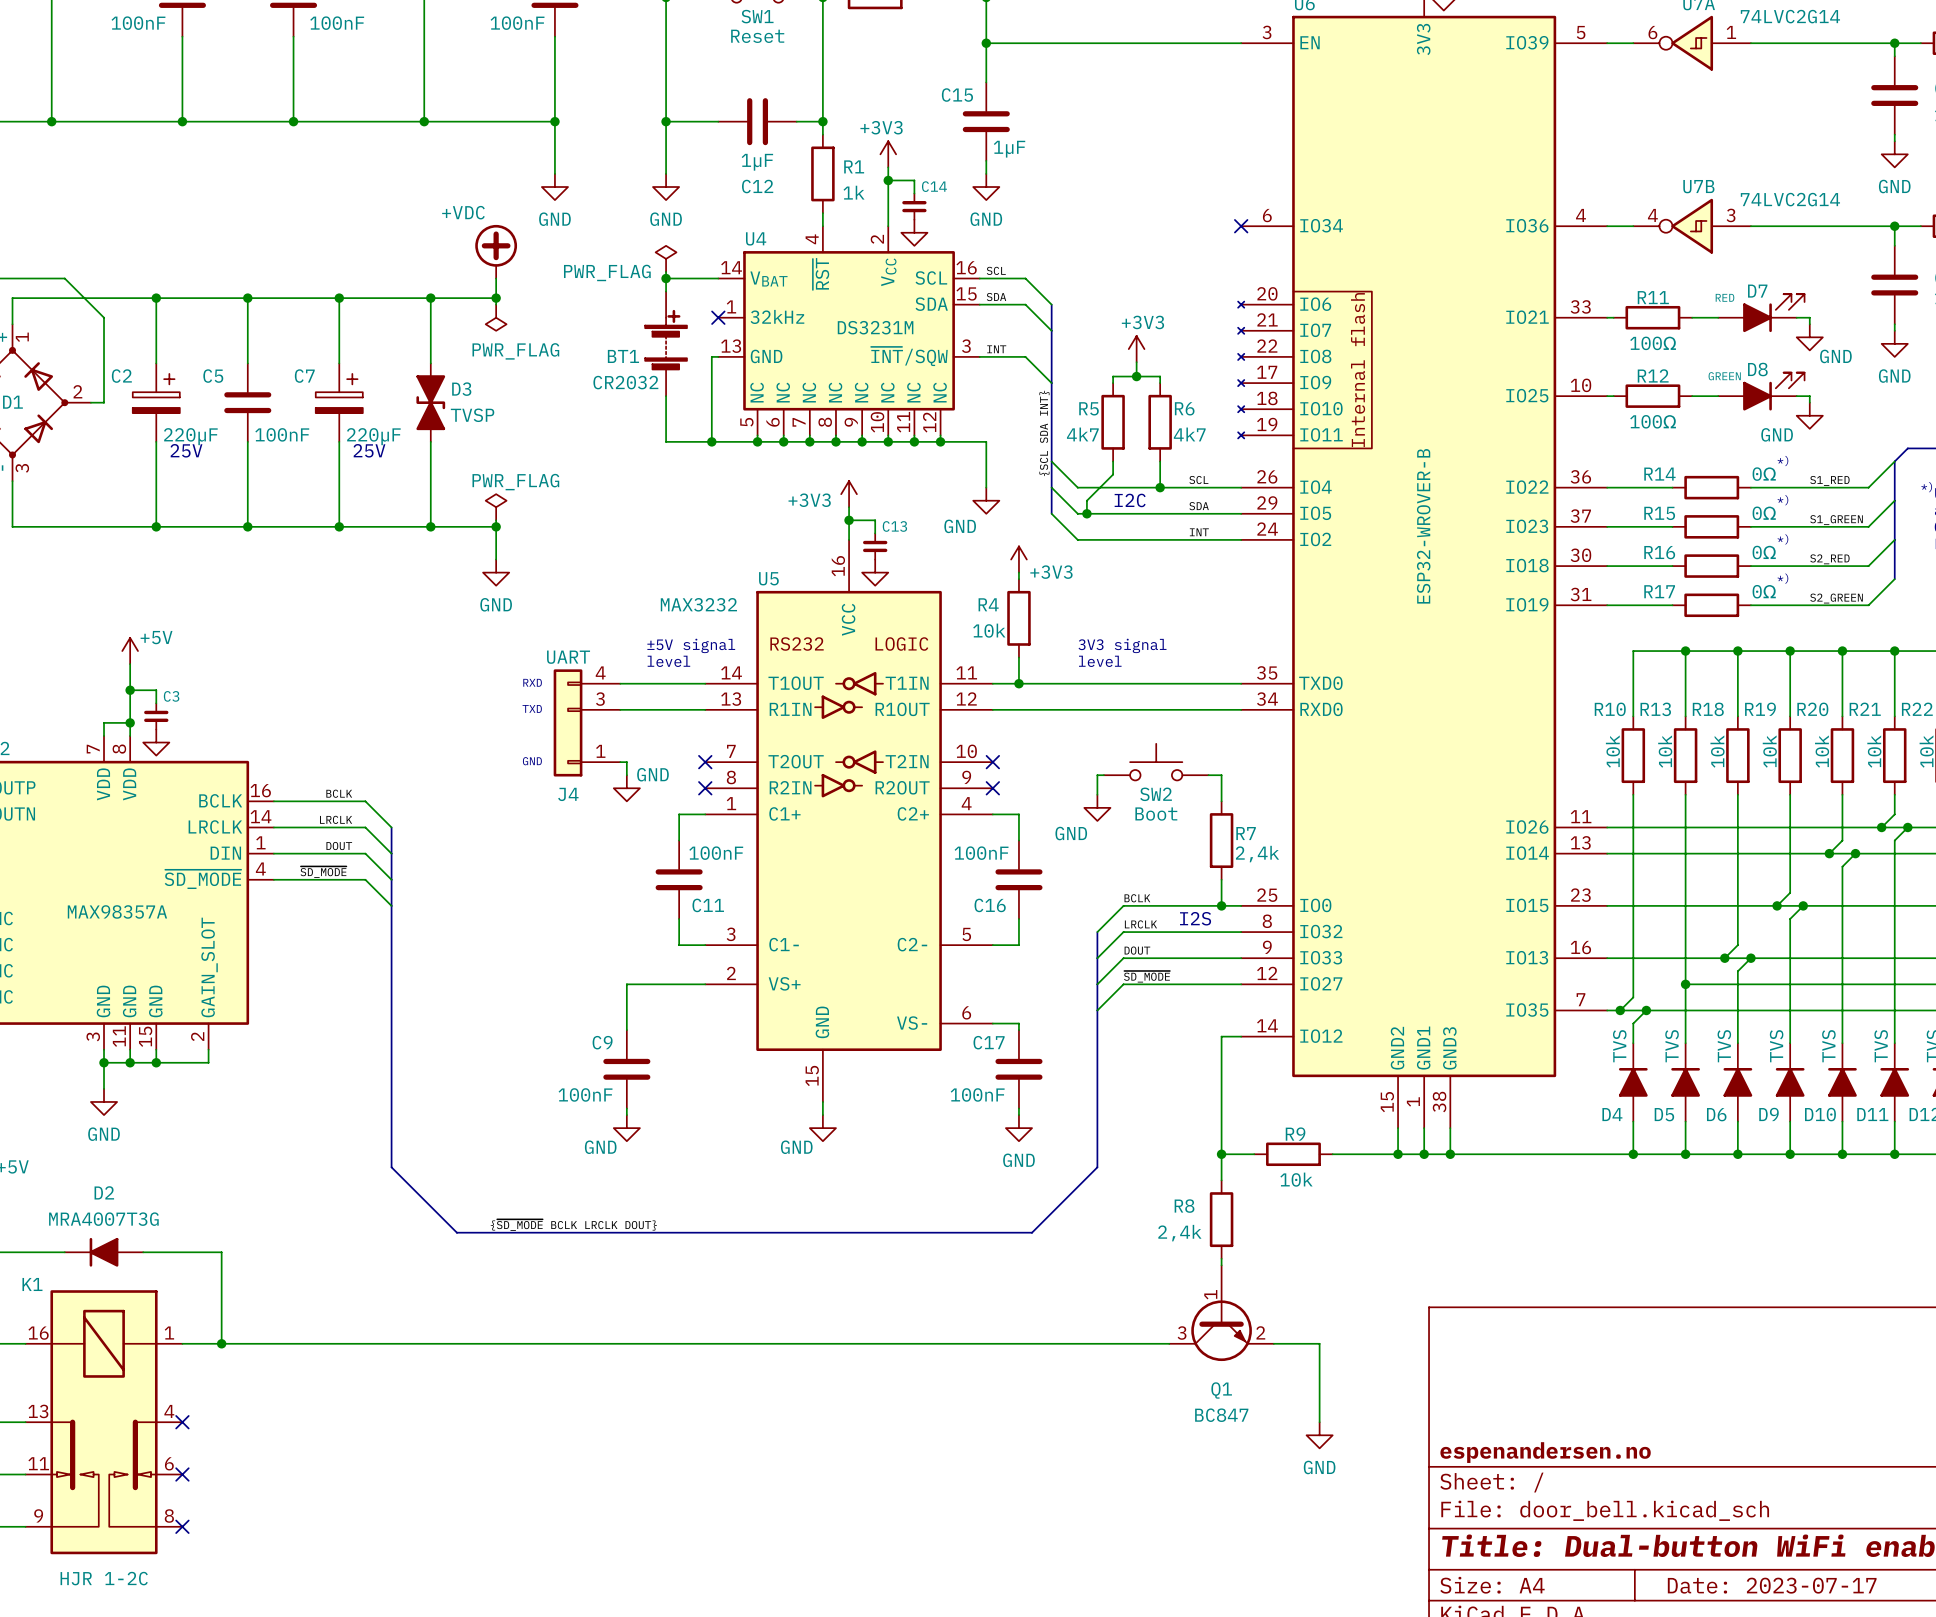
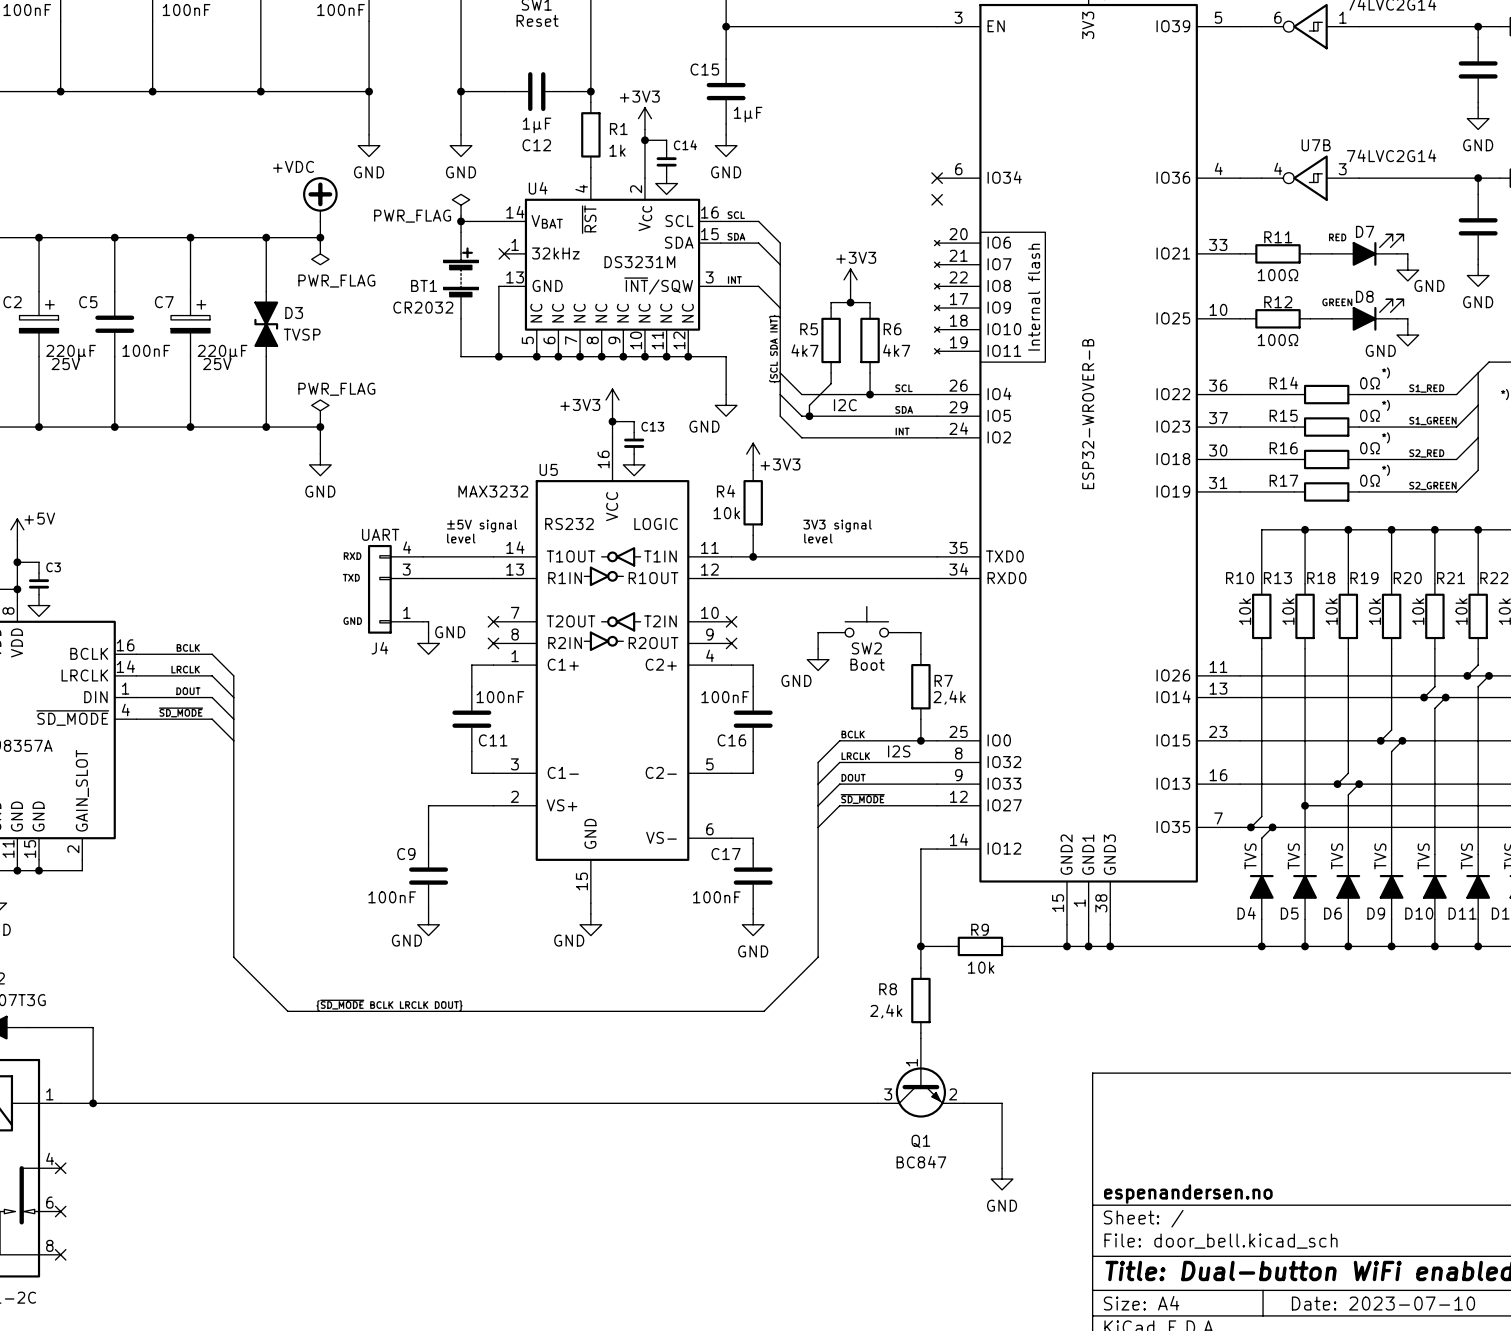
no-connect mark: none -> (937, 199)
title block: Date: 2023-07-17 (1772, 1585) -> Date: 2023-07-10 (1383, 1303)

